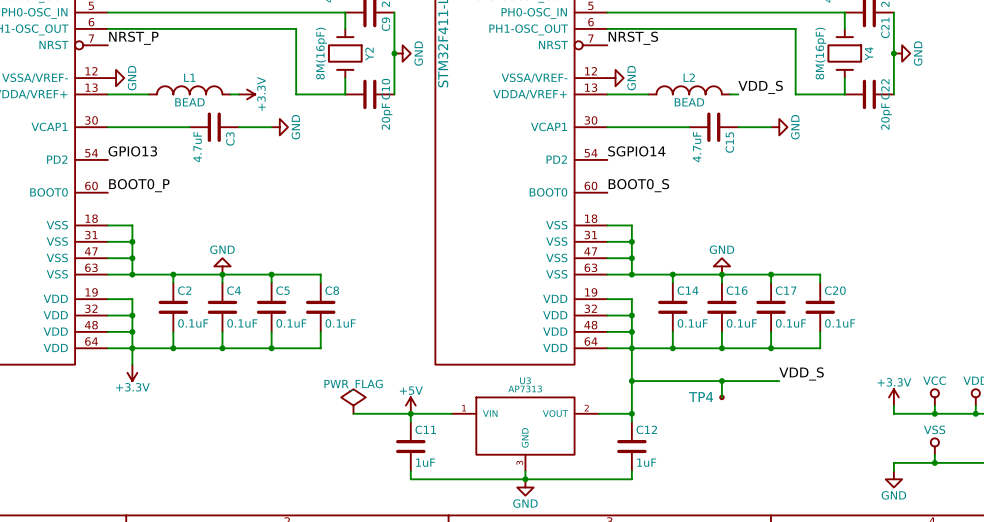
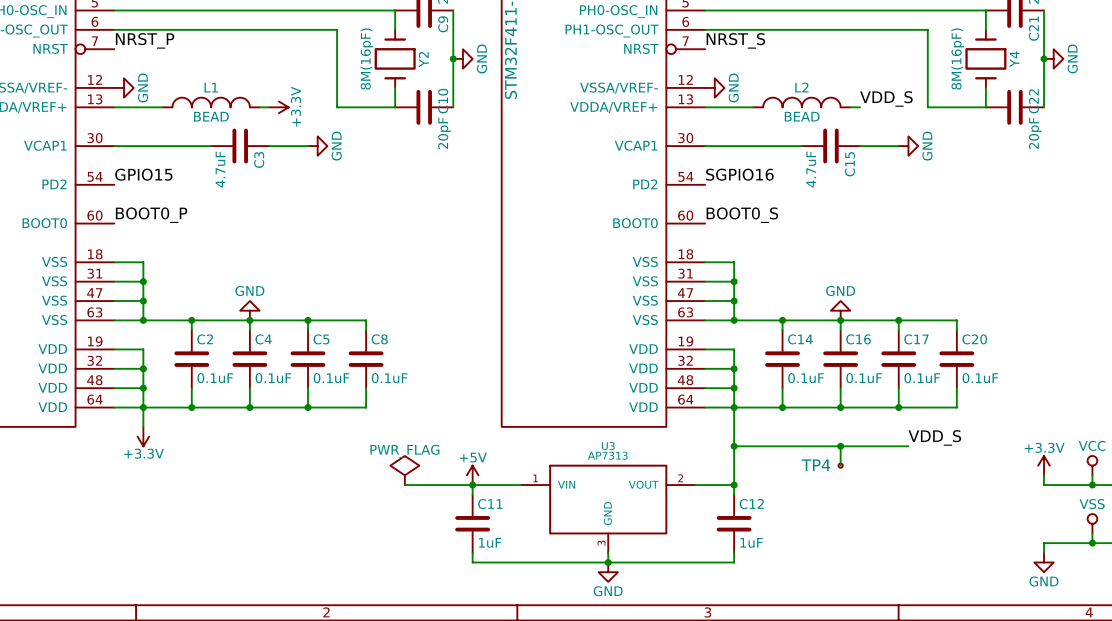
label: GPIO13 (132, 151) -> GPIO15 (143, 174)
label: SGPIO14 (636, 151) -> SGPIO16 (739, 174)

